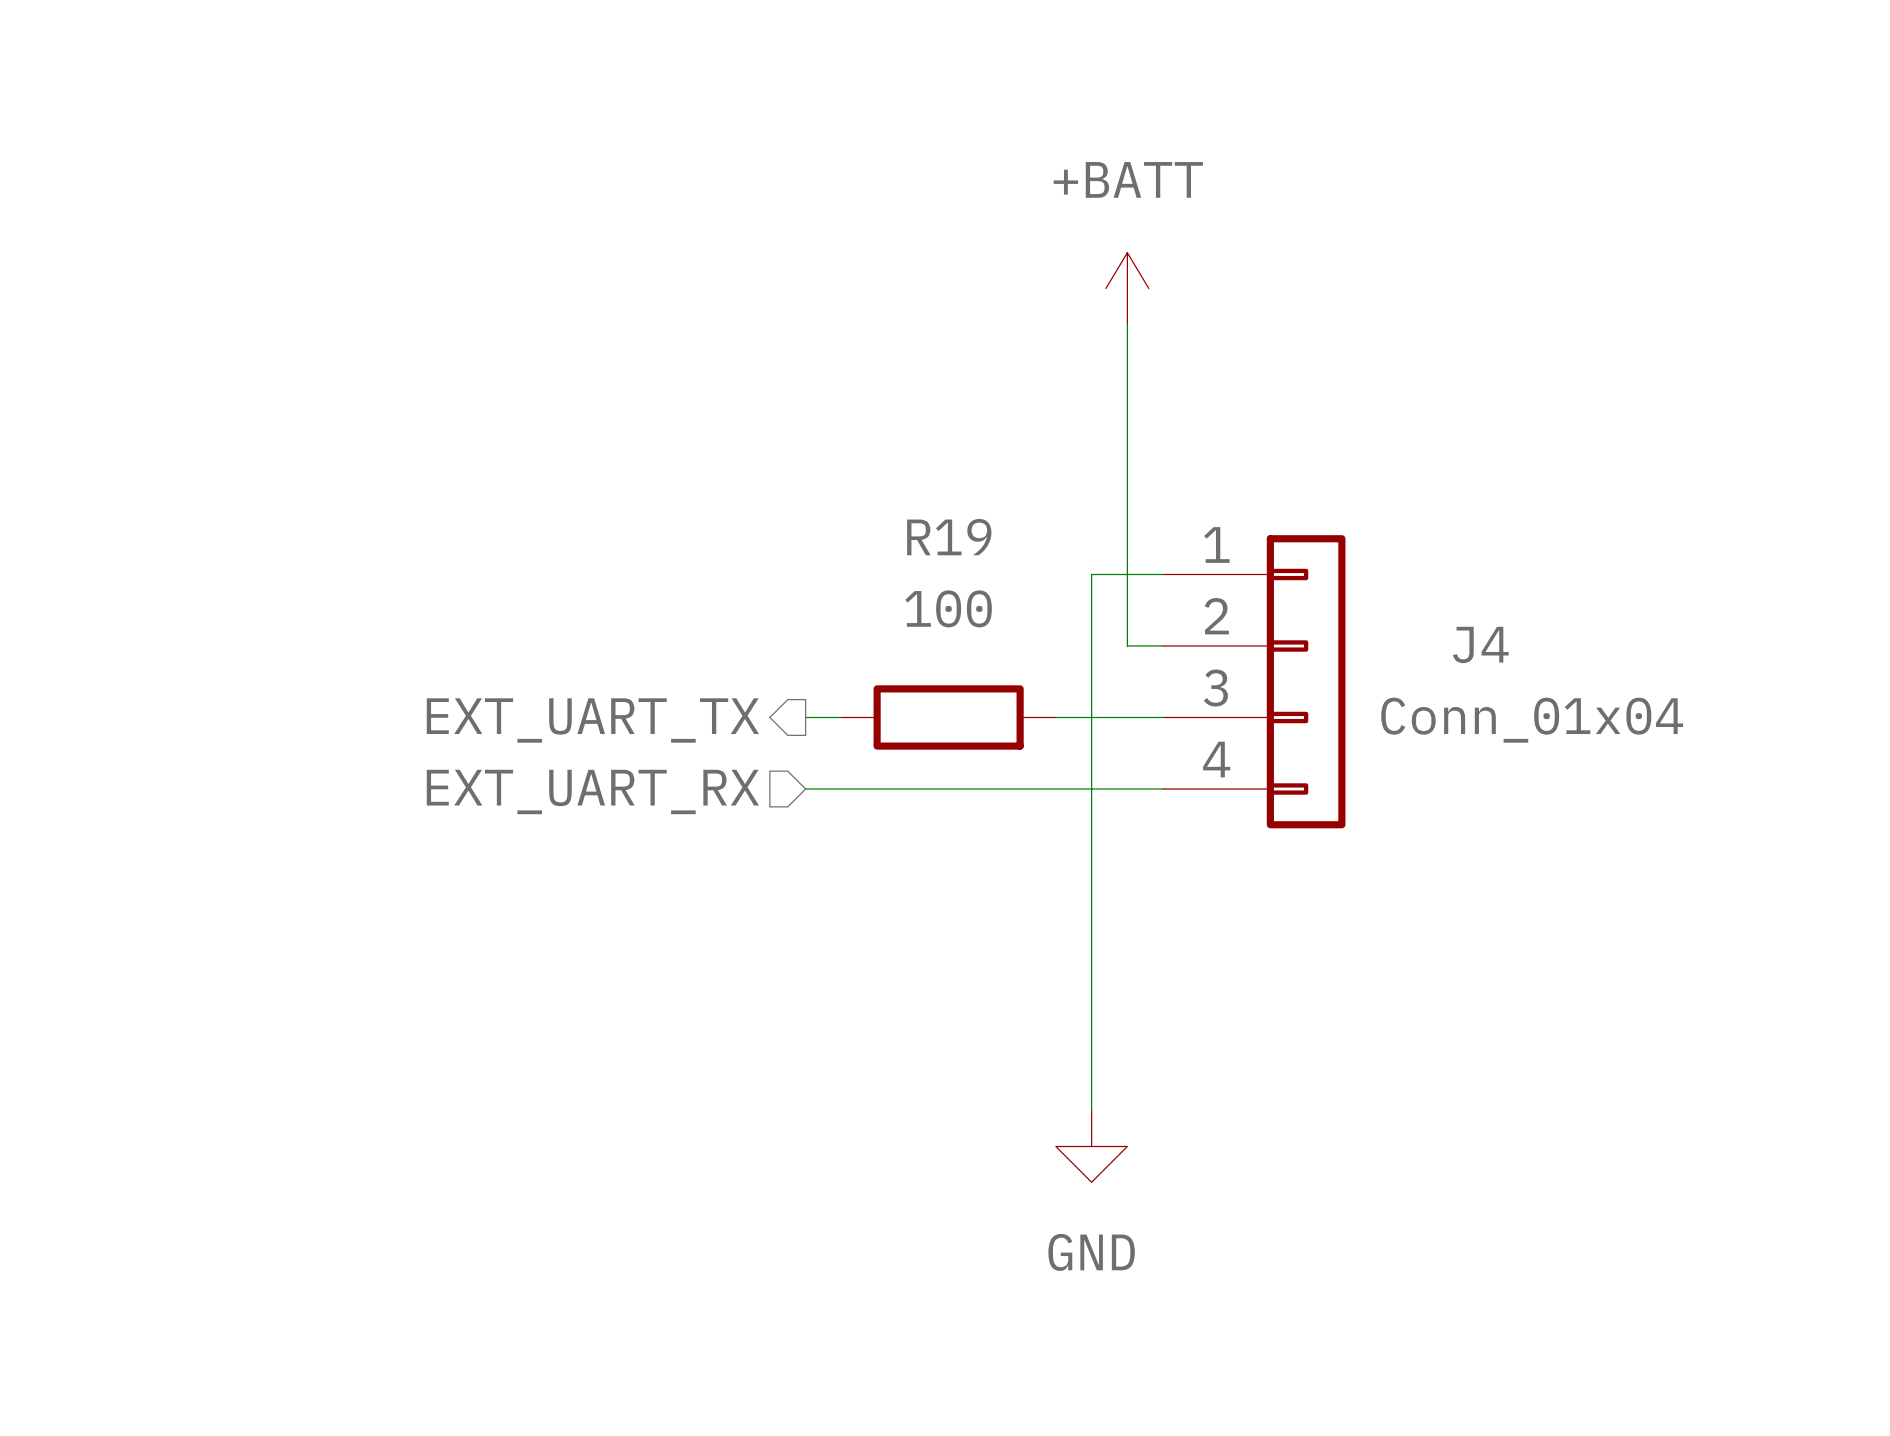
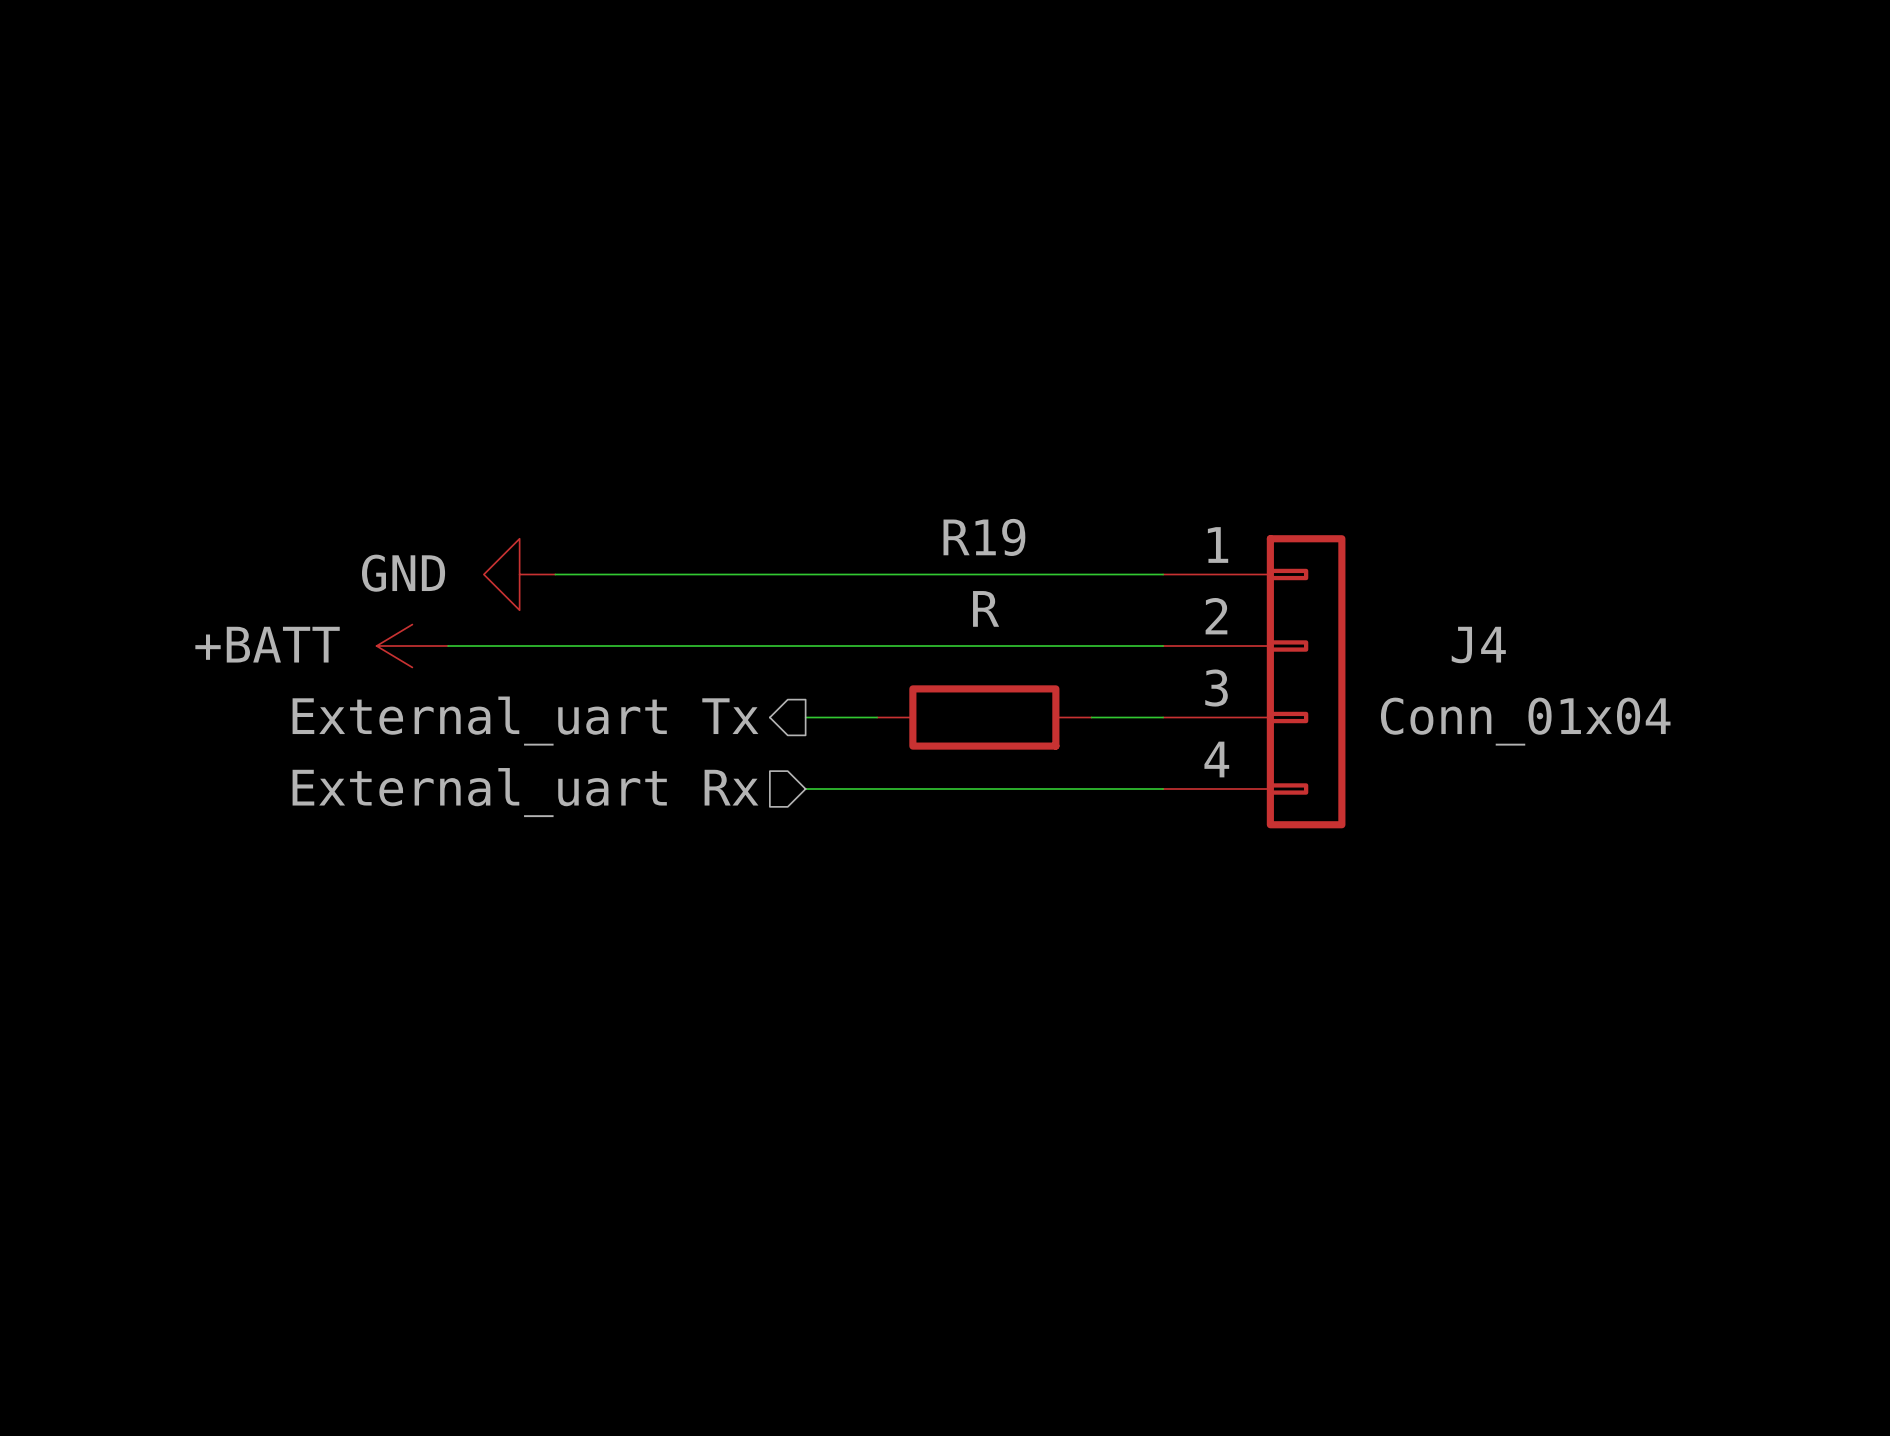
power symbol: +BATT (1127, 288) -> none
wire: (1127, 324) (1127, 646) -> (448, 646) (1127, 646)
power symbol: none -> GND (519, 574)
wire: (1091, 574) (1091, 1110) -> (1091, 574) (555, 574)
R19 value: 100 (948, 608) -> R (986, 608)
power symbol: none -> +BATT (412, 646)
R19 position: (948, 717) -> (984, 717)
hierarchical label: EXT_UART_TX (592, 720) -> External_uart Tx (525, 721)
hierarchical label: EXT_UART_RX (592, 791) -> External_uart Rx (525, 792)
power symbol: GND (1091, 1146) -> none

